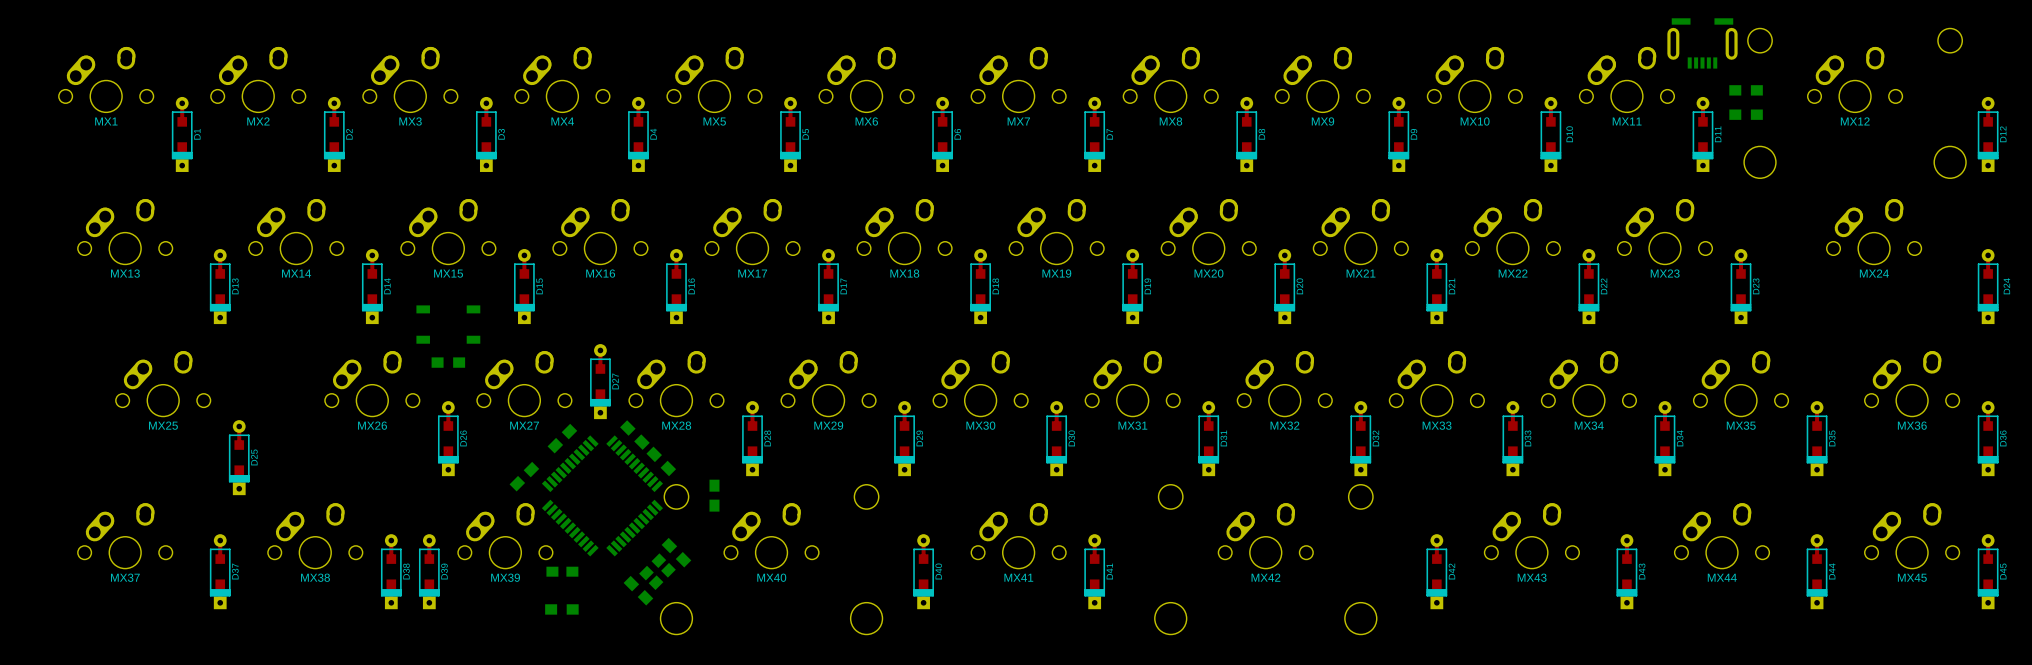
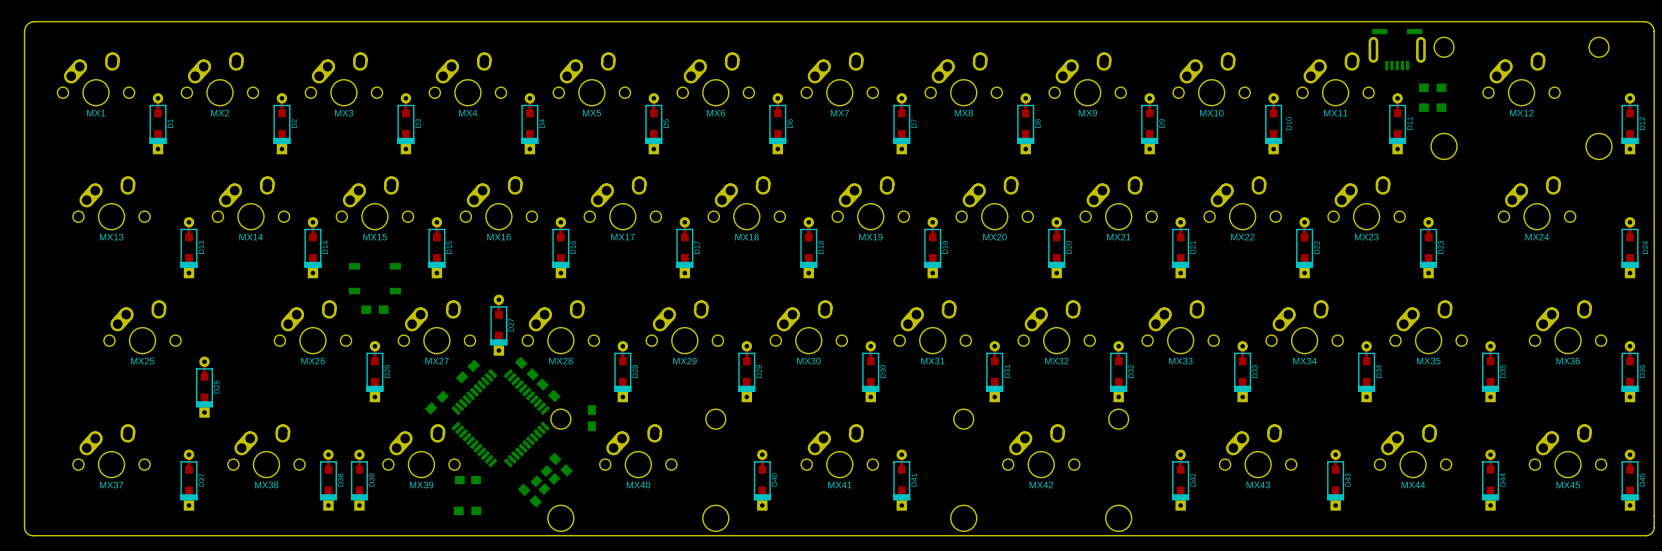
board edge: none -> (34, 21) (1646, 22) (1652, 25) (1654, 31) (1653, 529) (1650, 533) (1645, 535) (30, 535) (26, 532) (24, 527) (24, 31) (27, 24) (34, 21)

